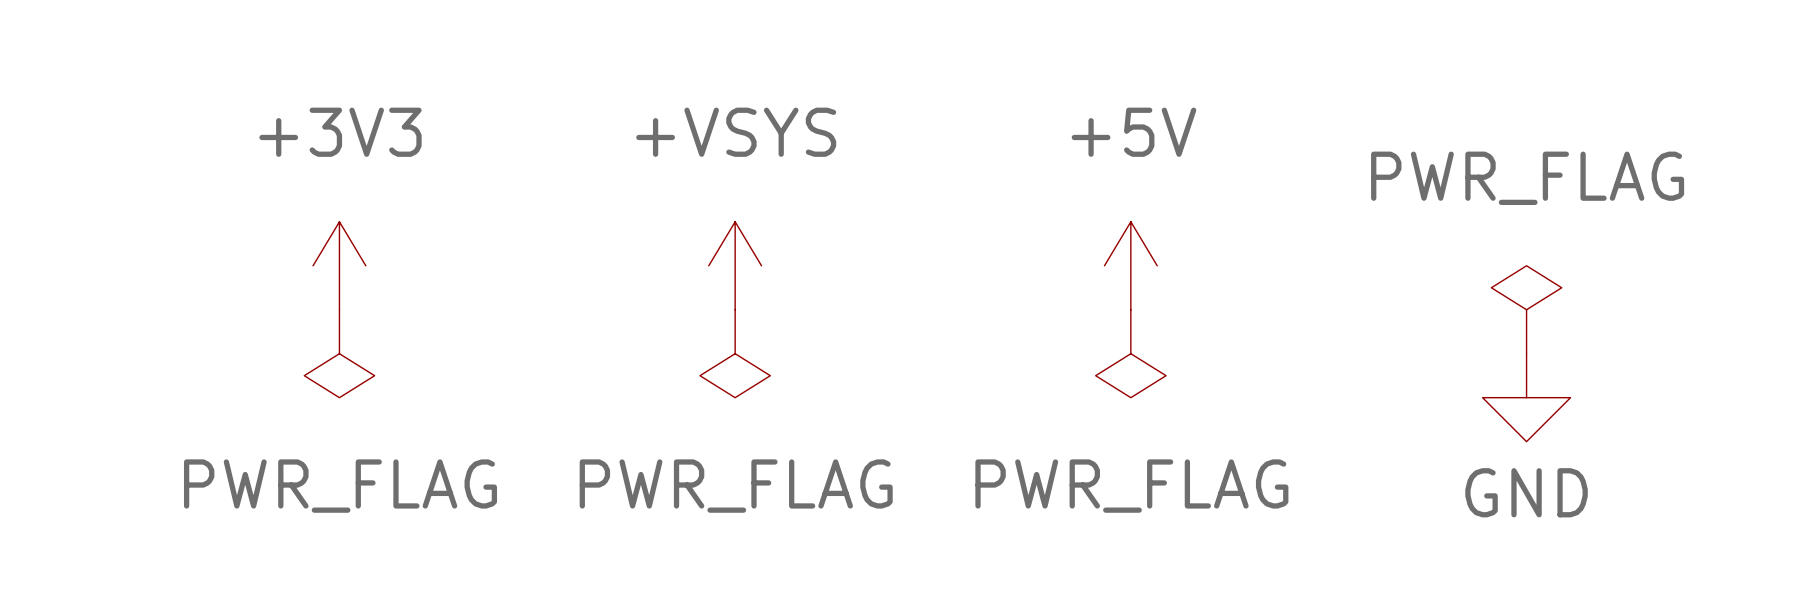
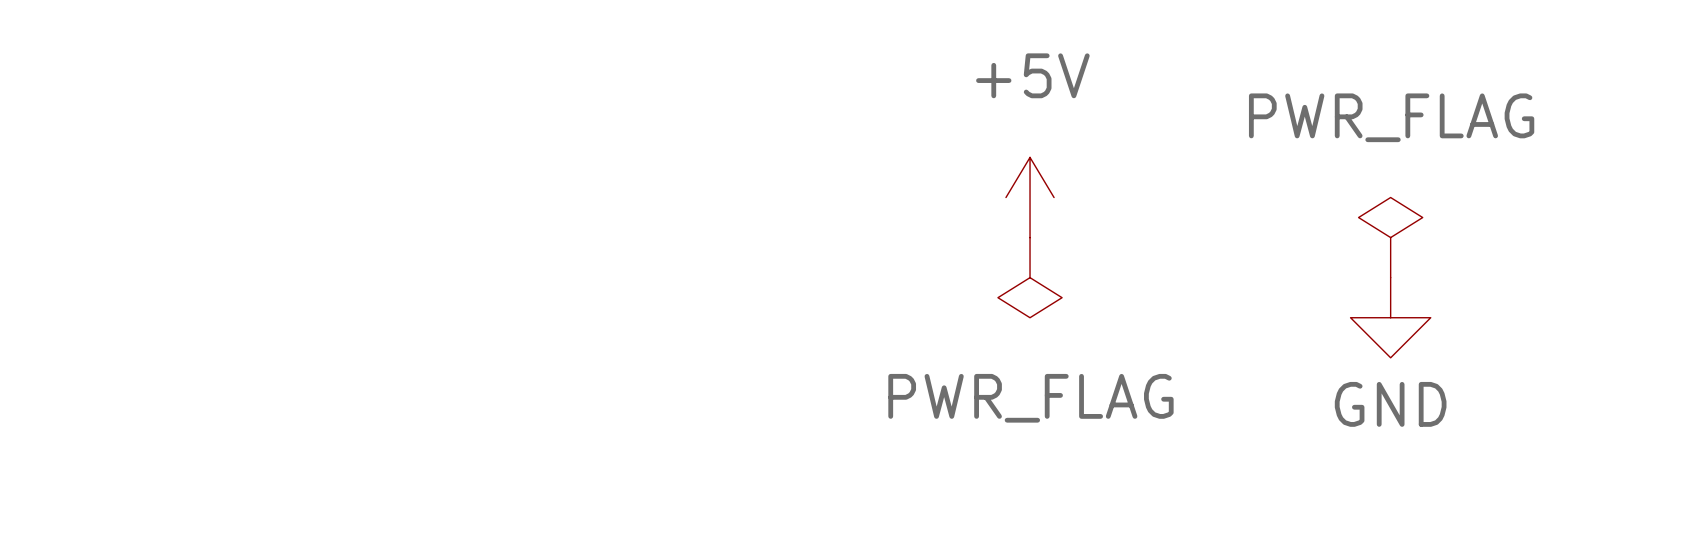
power symbol: +3V3 (339, 265) -> none
power symbol: +VSYS (735, 265) -> none
power symbol: PWR_FLAG (339, 353) -> none
power symbol: PWR_FLAG (735, 353) -> none

